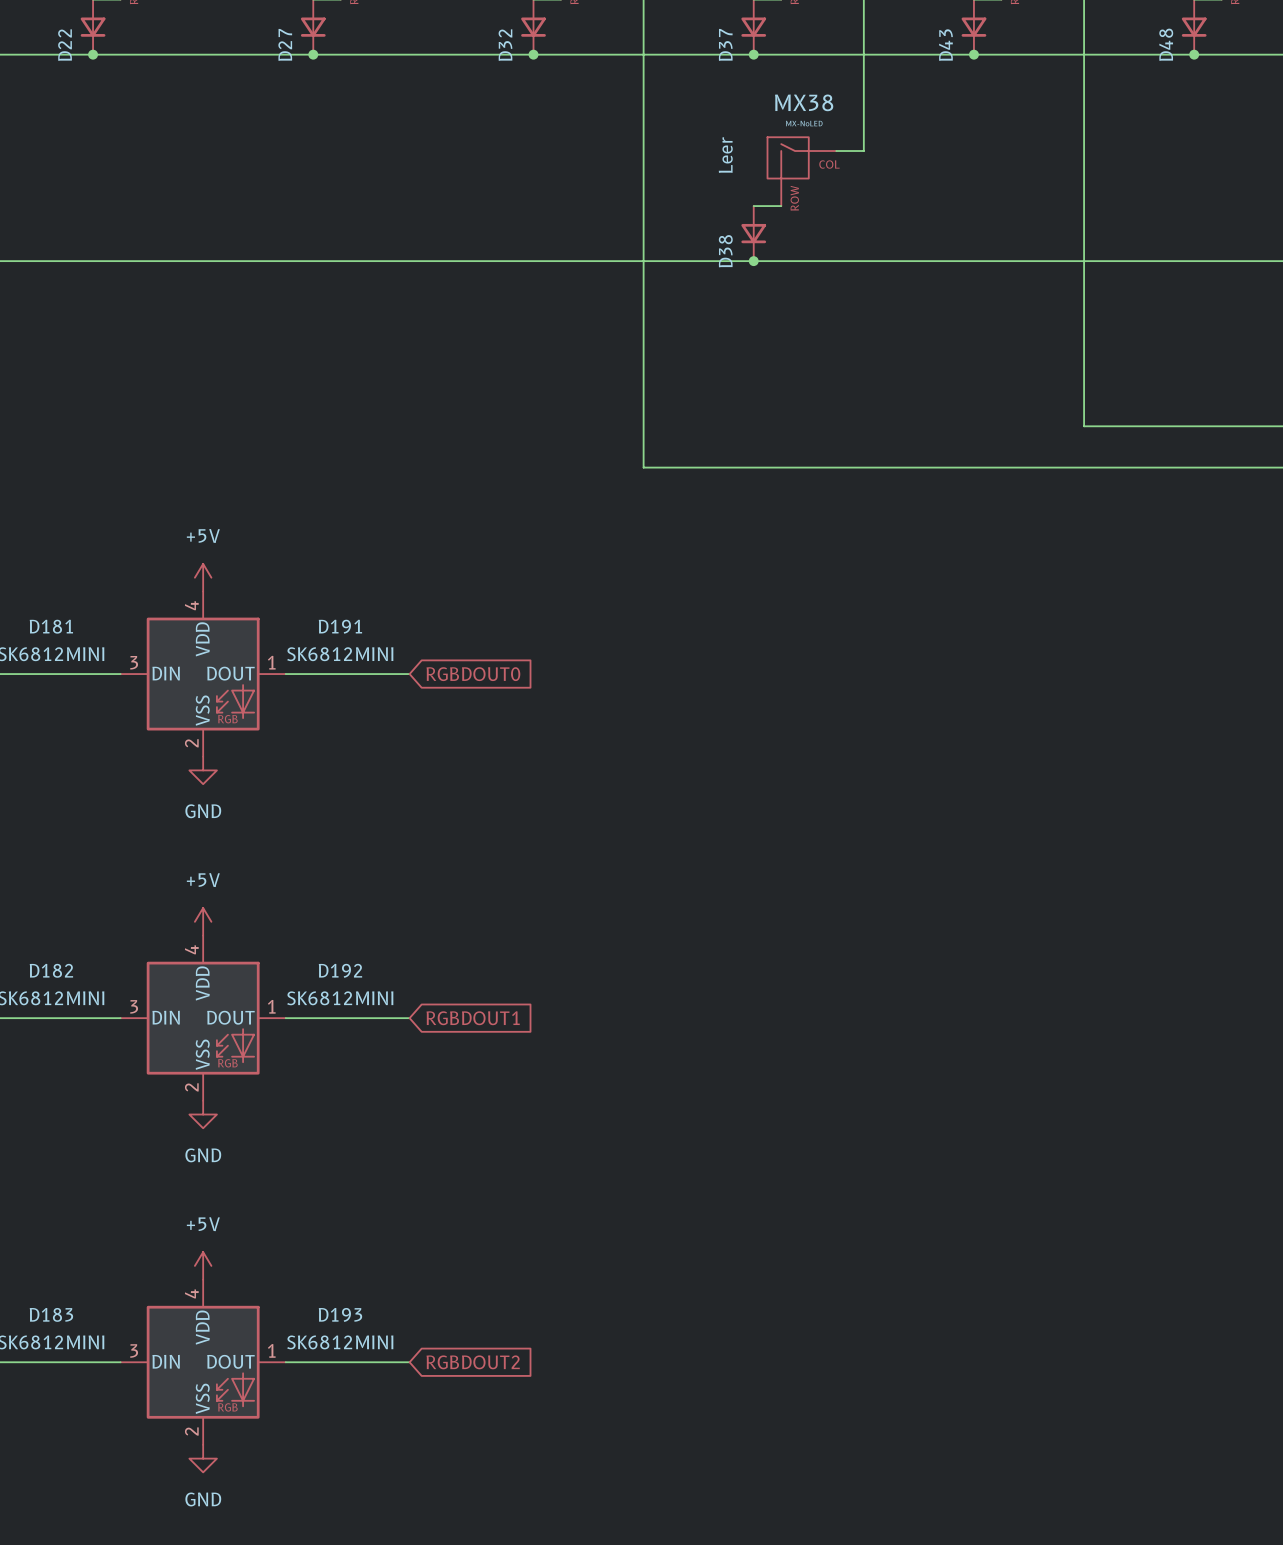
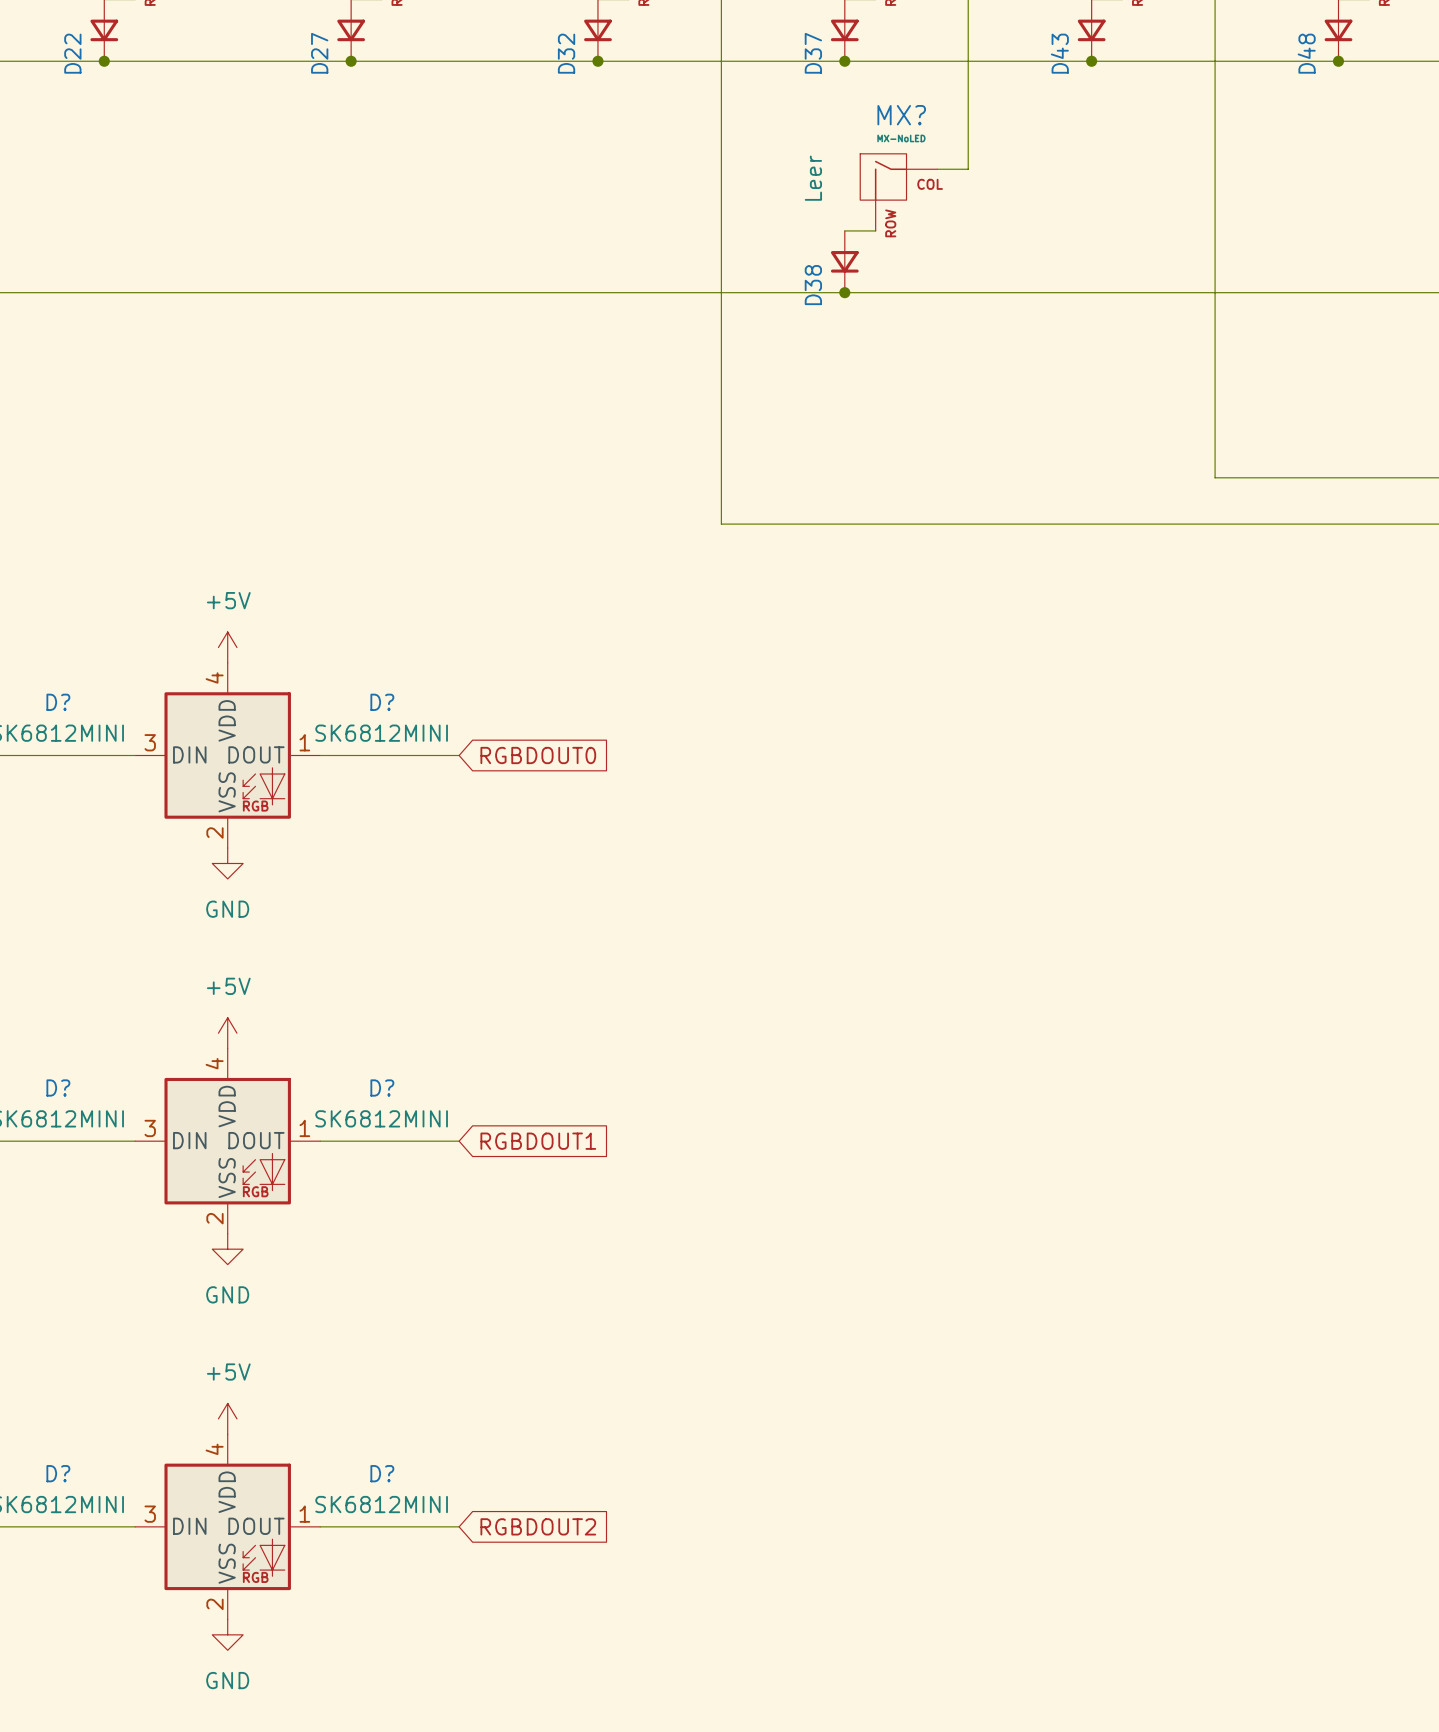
MX38 name: MX38 (804, 102) -> MX? (901, 115)
D181 name: D181 (51, 626) -> D? (58, 702)
D191 name: D191 (340, 626) -> D? (382, 702)
D182 name: D182 (51, 970) -> D? (58, 1088)
D192 name: D192 (340, 970) -> D? (382, 1088)
D183 name: D183 (51, 1314) -> D? (58, 1473)
D193 name: D193 (340, 1314) -> D? (382, 1473)

